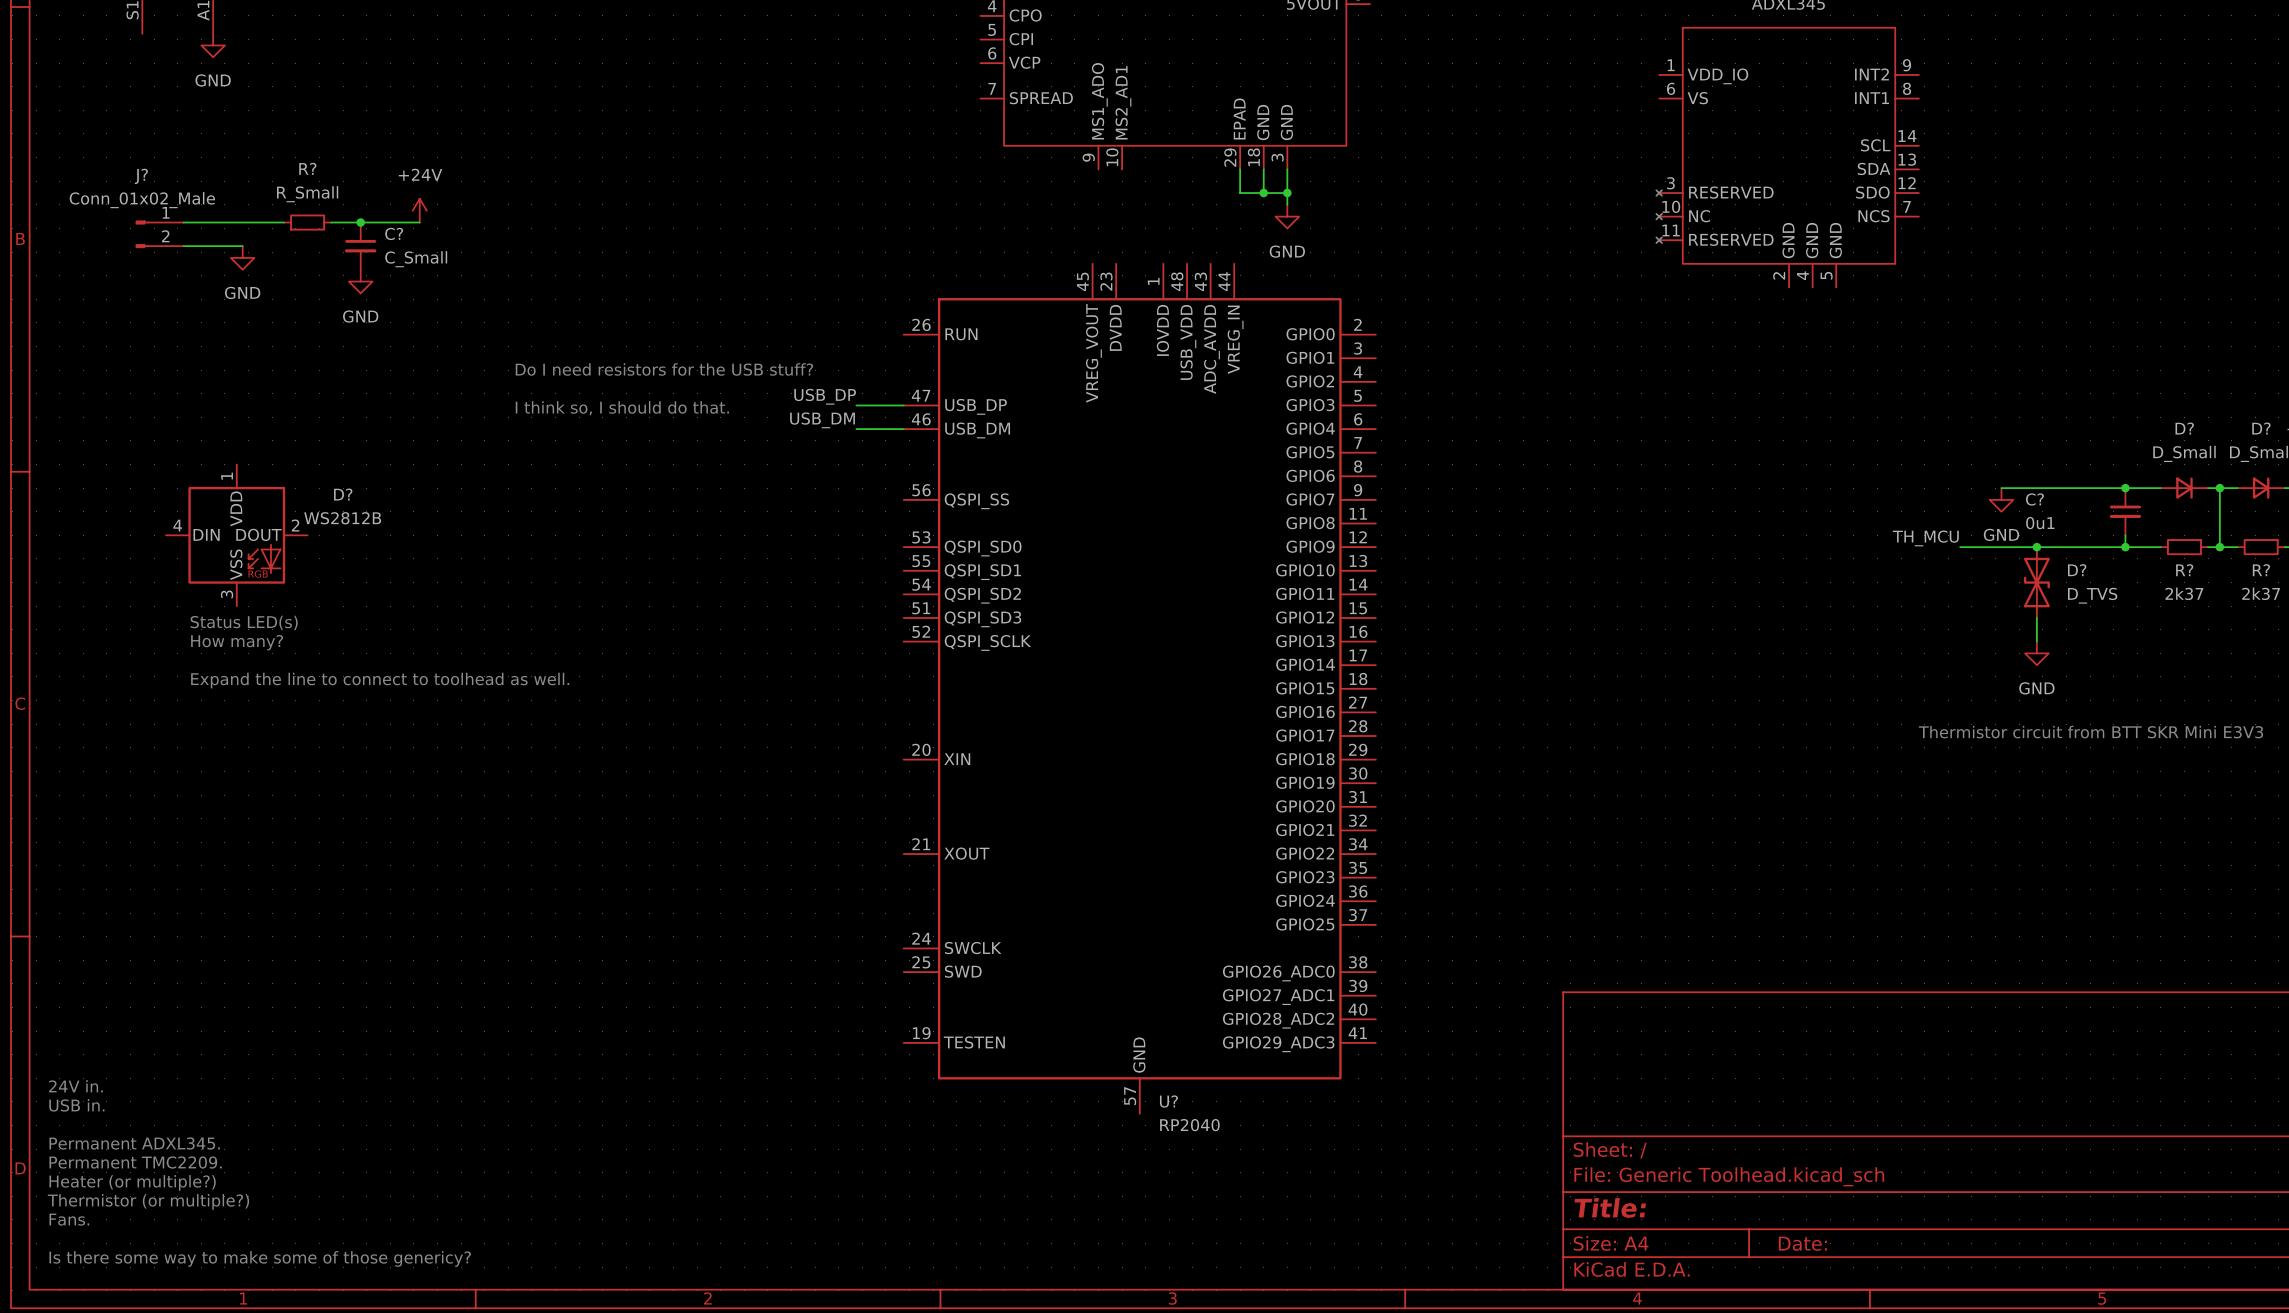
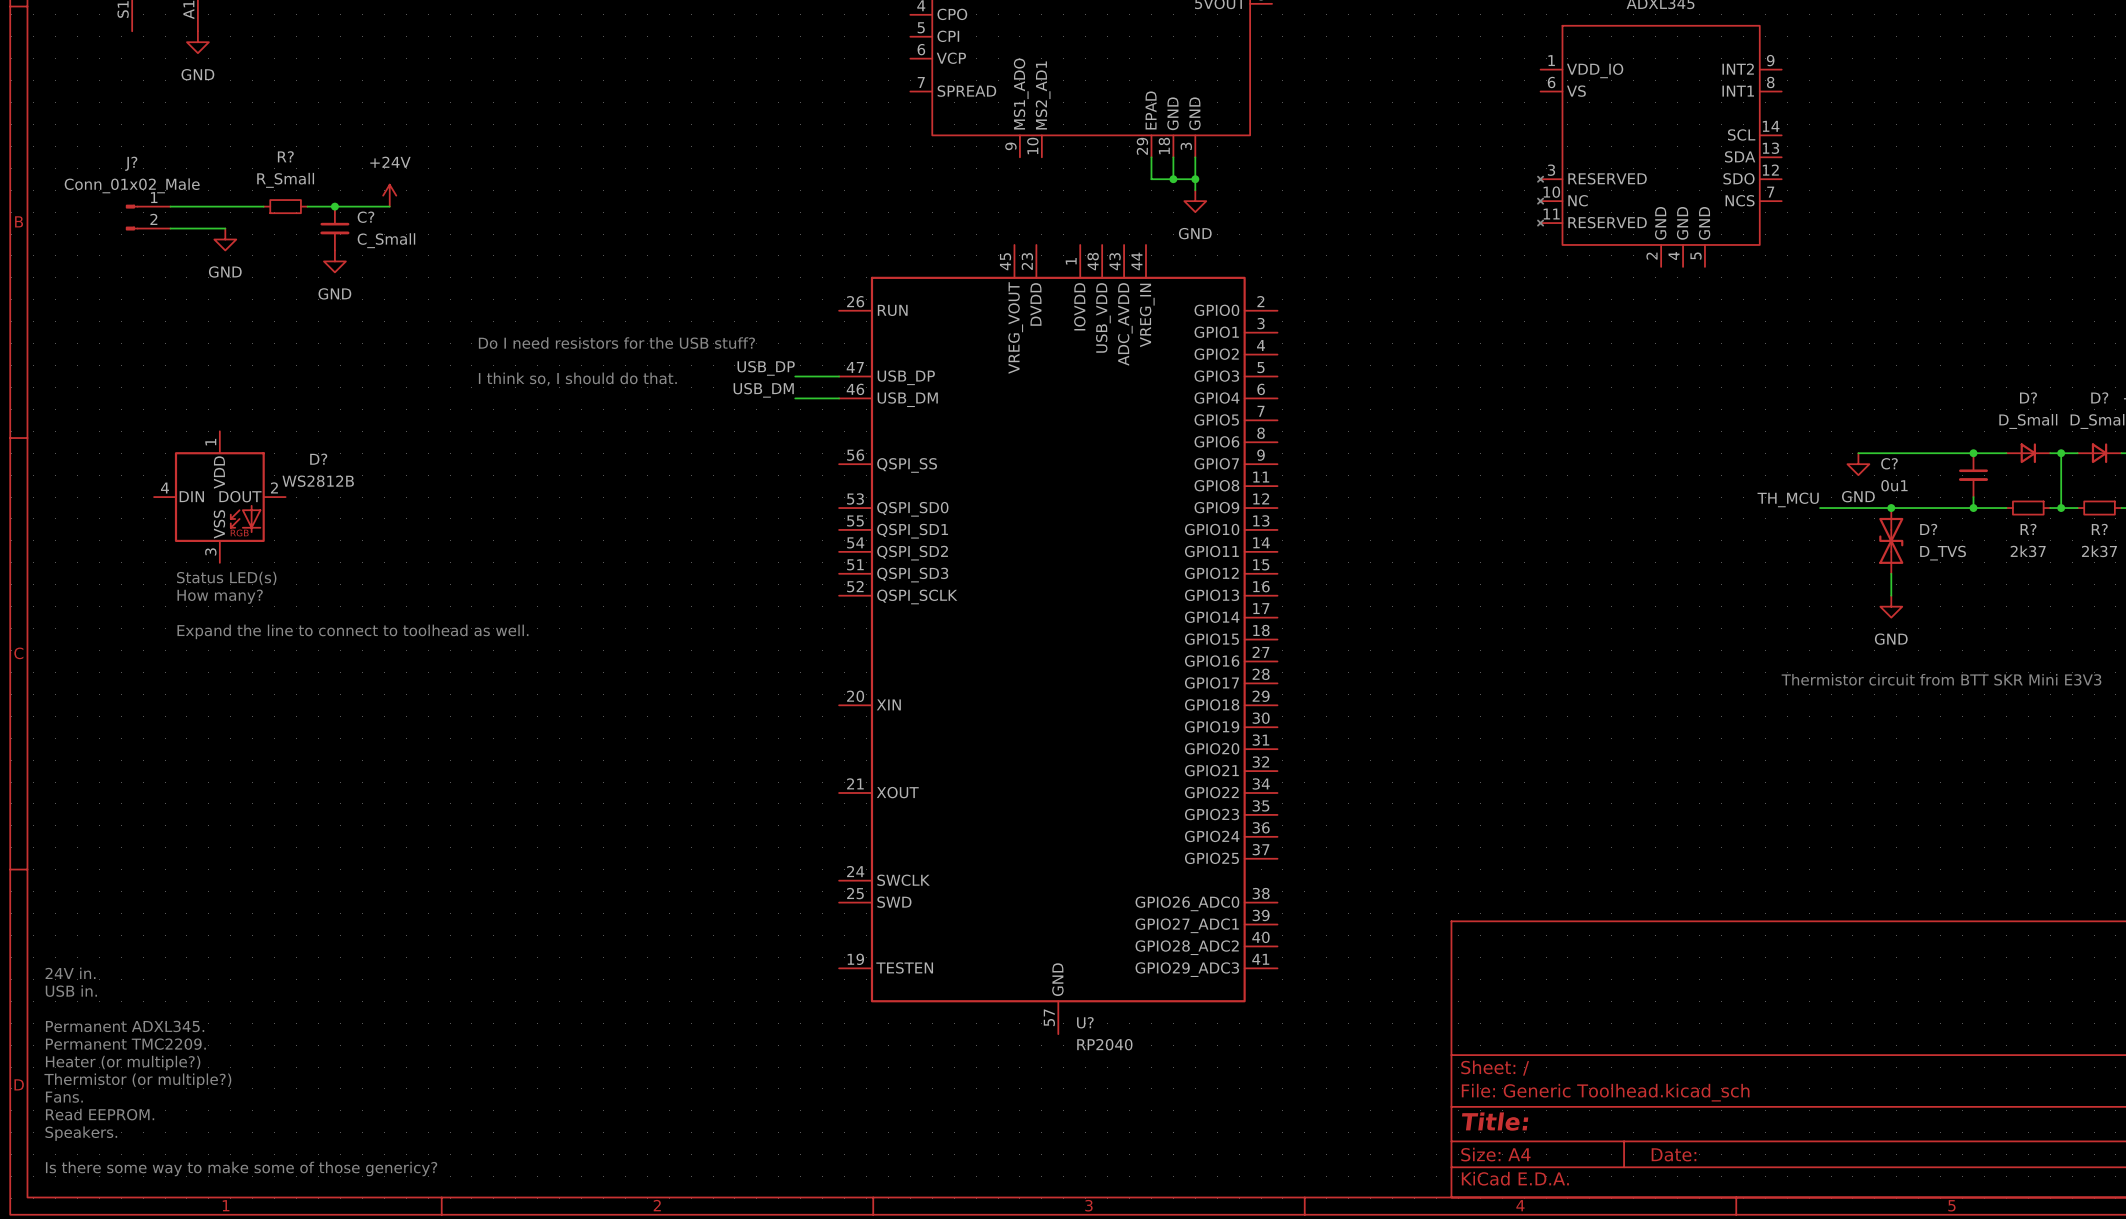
text: none -> USB in. (71, 991)
text position: 24V in. (75, 1086) -> 24V in. (70, 973)
text: USB in. (76, 1105) -> Permanent ADXL345. (125, 1026)
text: none -> Permanent TMC2209. (125, 1044)
text: Permanent ADXL345. (134, 1143) -> Heater (or multiple?) (123, 1063)
text: Permanent TMC2209. (135, 1162) -> Thermistor (or multiple?) (137, 1080)
text: Heater (or multiple?) (132, 1182) -> Fans. (64, 1097)
text: Thermistor (or multiple?) (148, 1201) -> Read EEPROM. (100, 1114)
text: Fans. (69, 1219) -> Speakers. (81, 1133)

